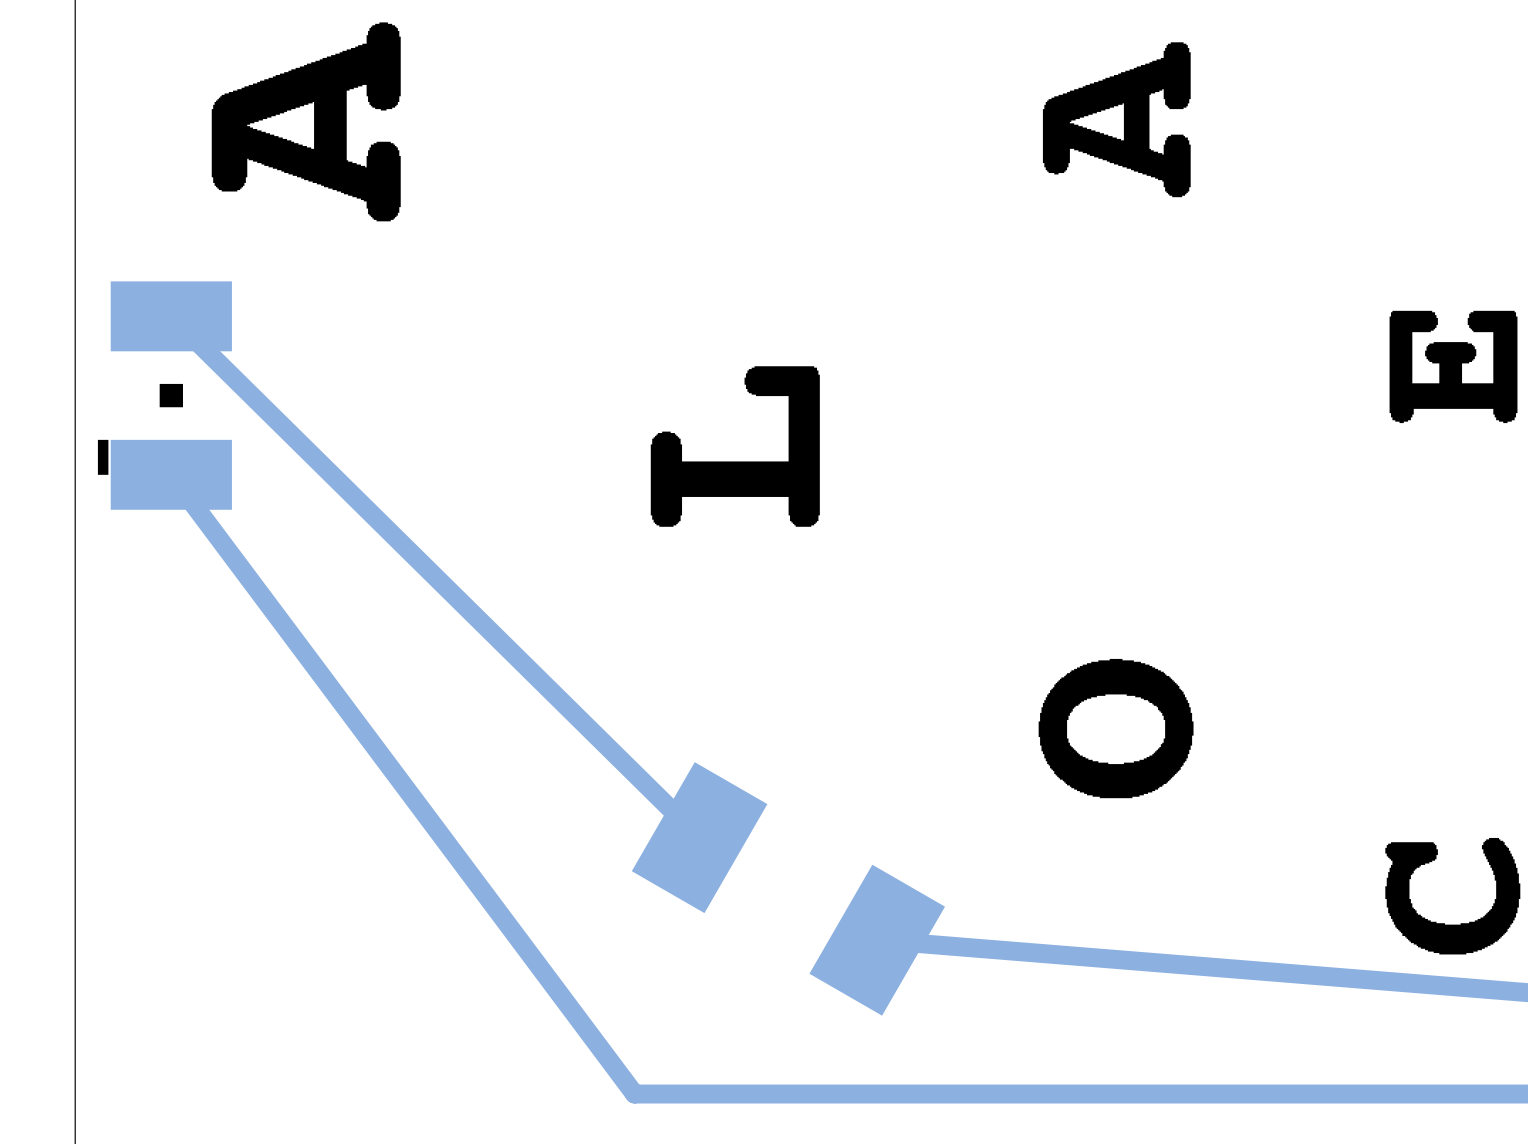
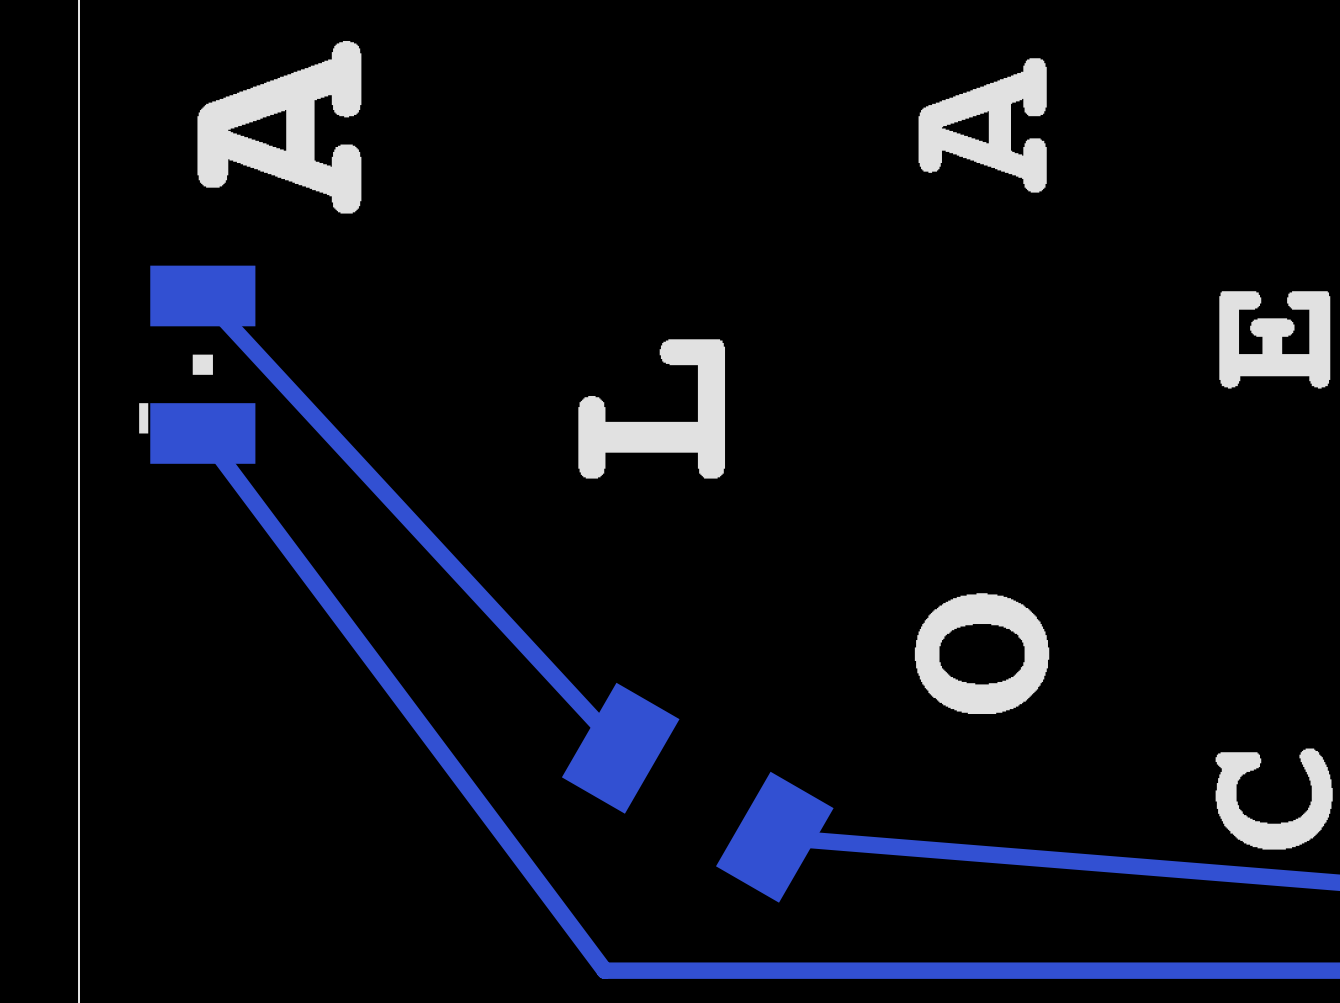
track: (171, 316) (699, 837) -> (202, 295) (620, 748)
part position: (164, 395) -> (197, 364)
track: (171, 474) (634, 1094) (681, 1094) -> (202, 433) (604, 970)

